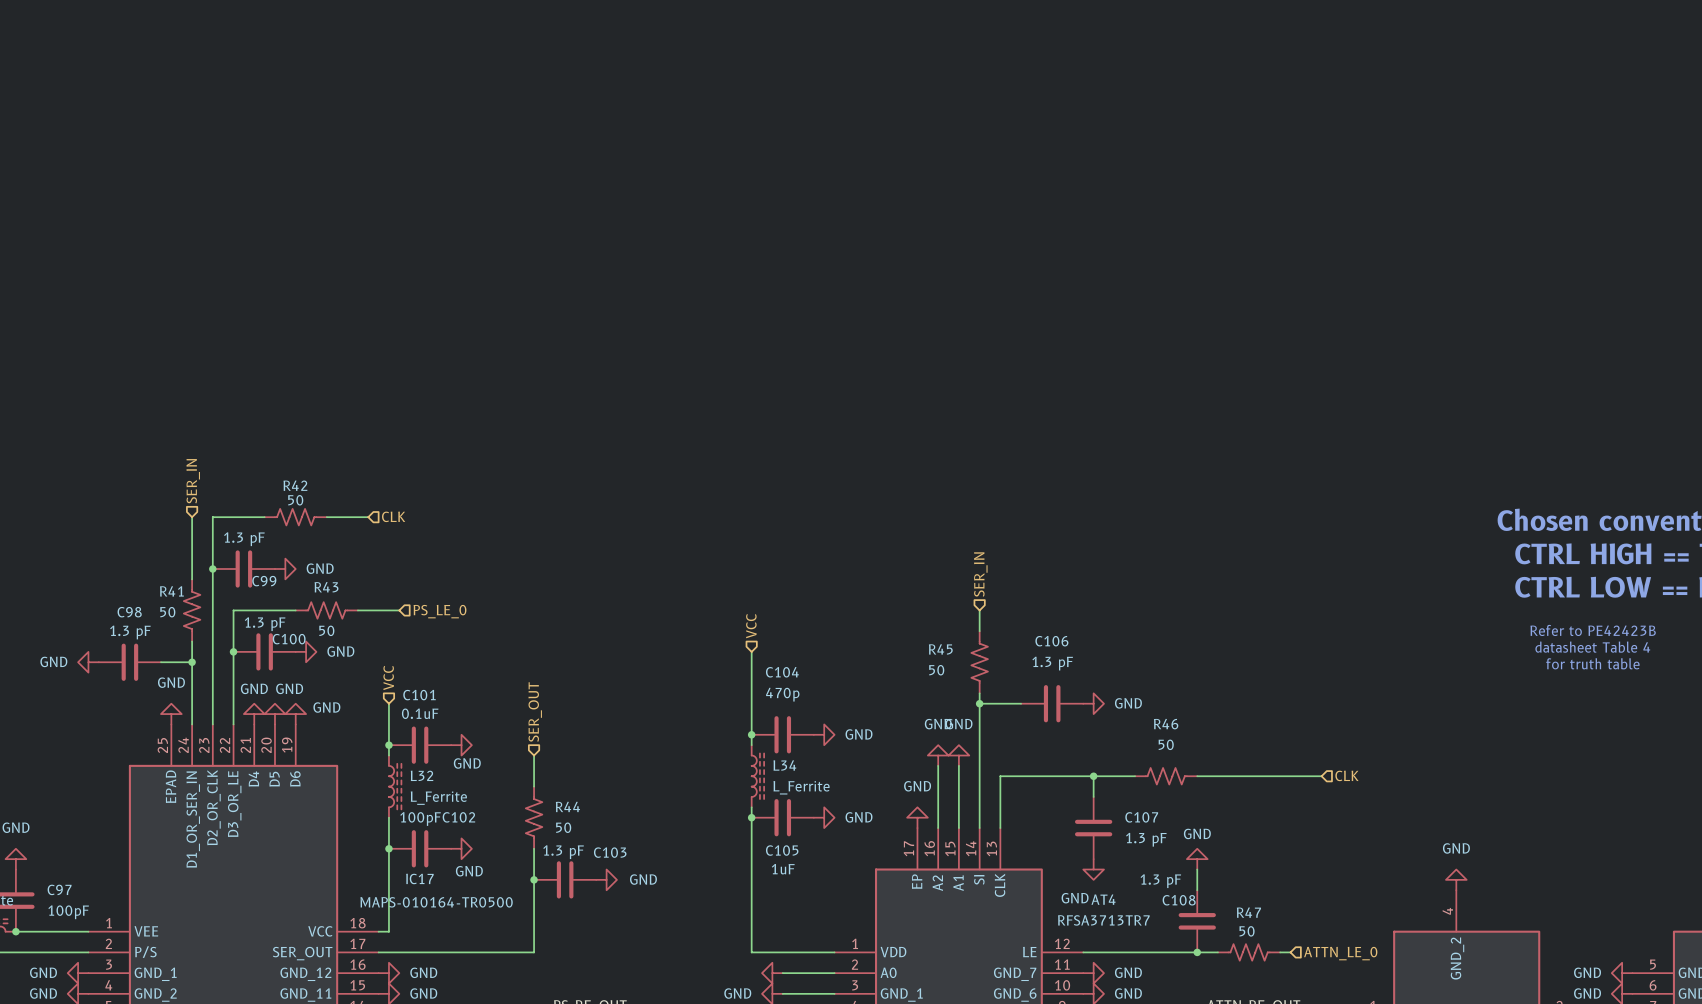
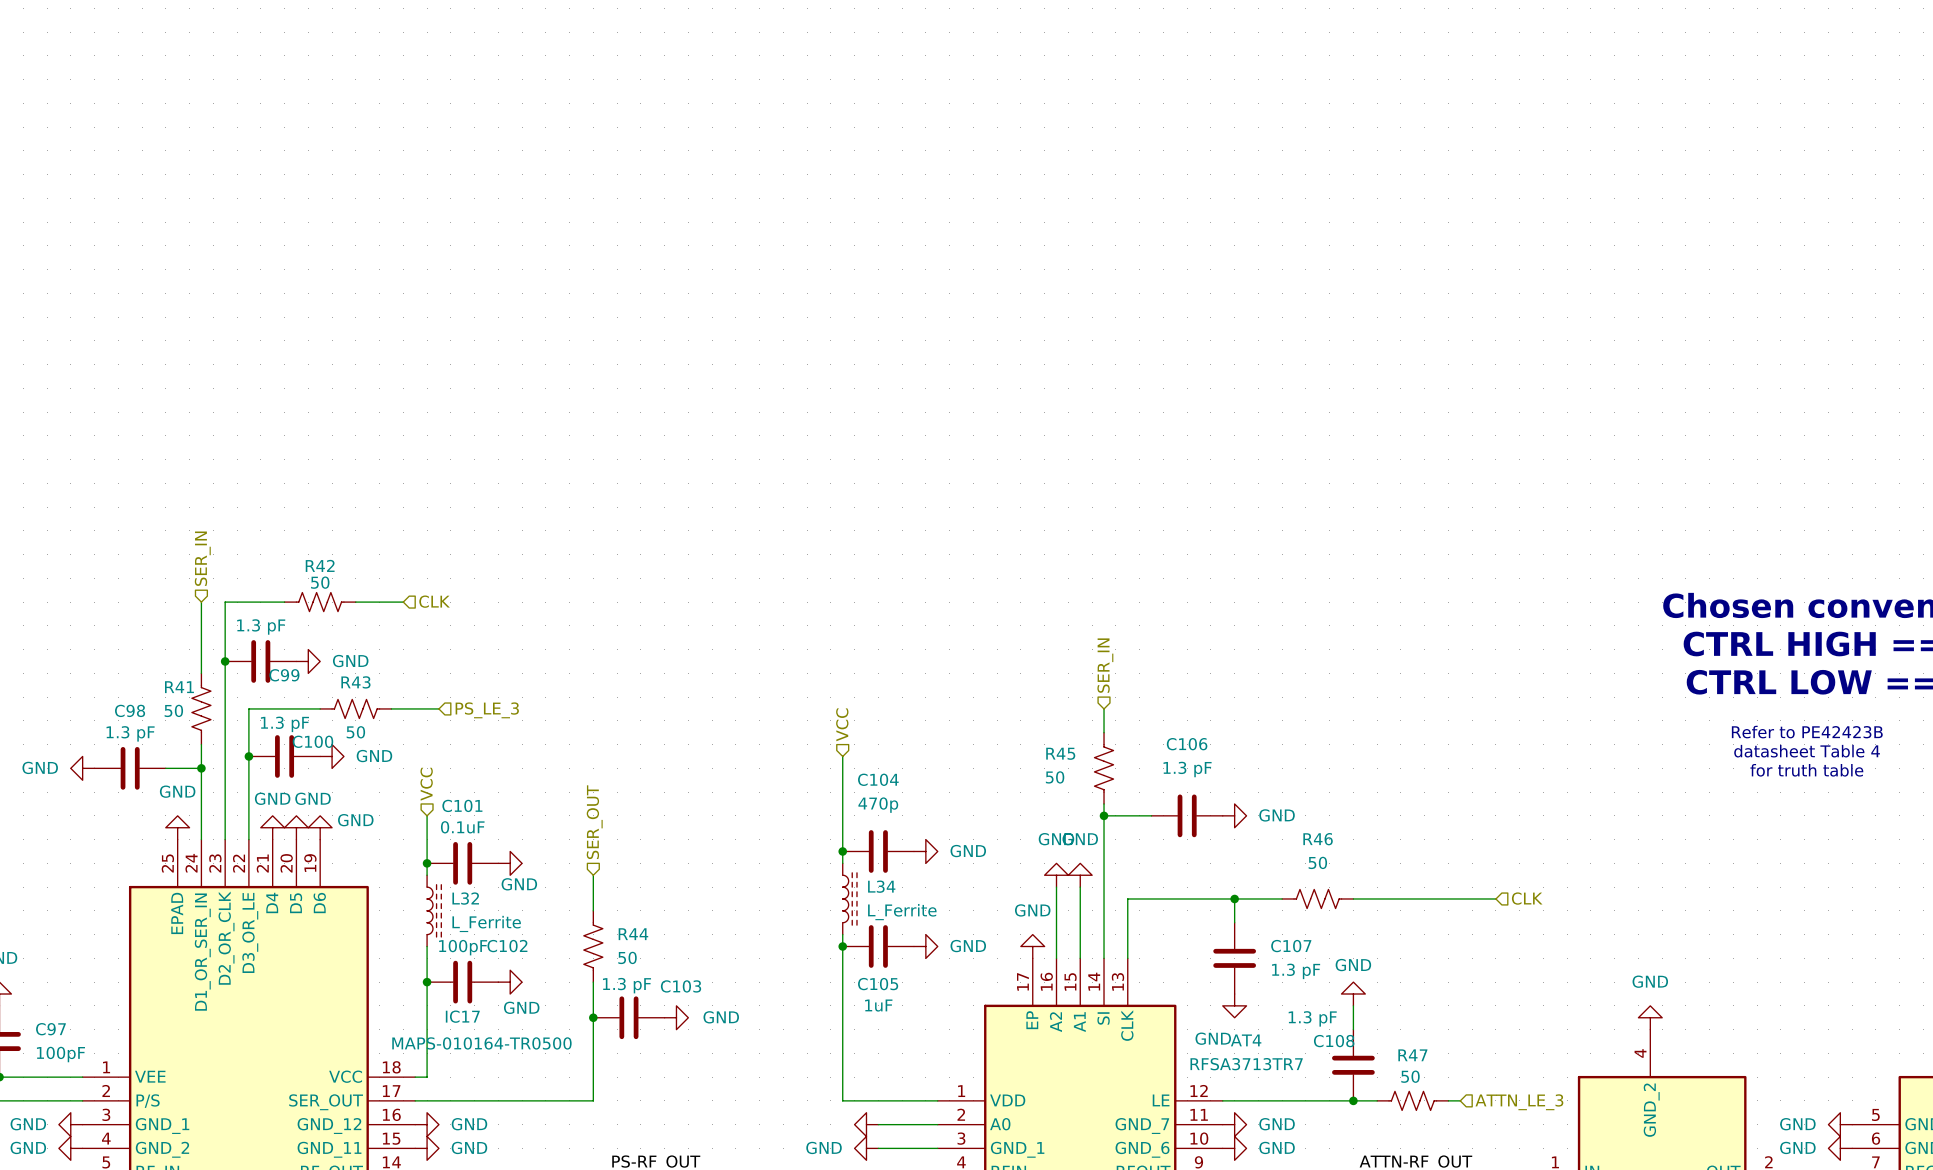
hierarchical label: PS_LE_0 (439, 611) -> PS_LE_3 (487, 710)
hierarchical label: ATTN_LE_0 (1340, 953) -> ATTN_LE_3 (1519, 1102)

